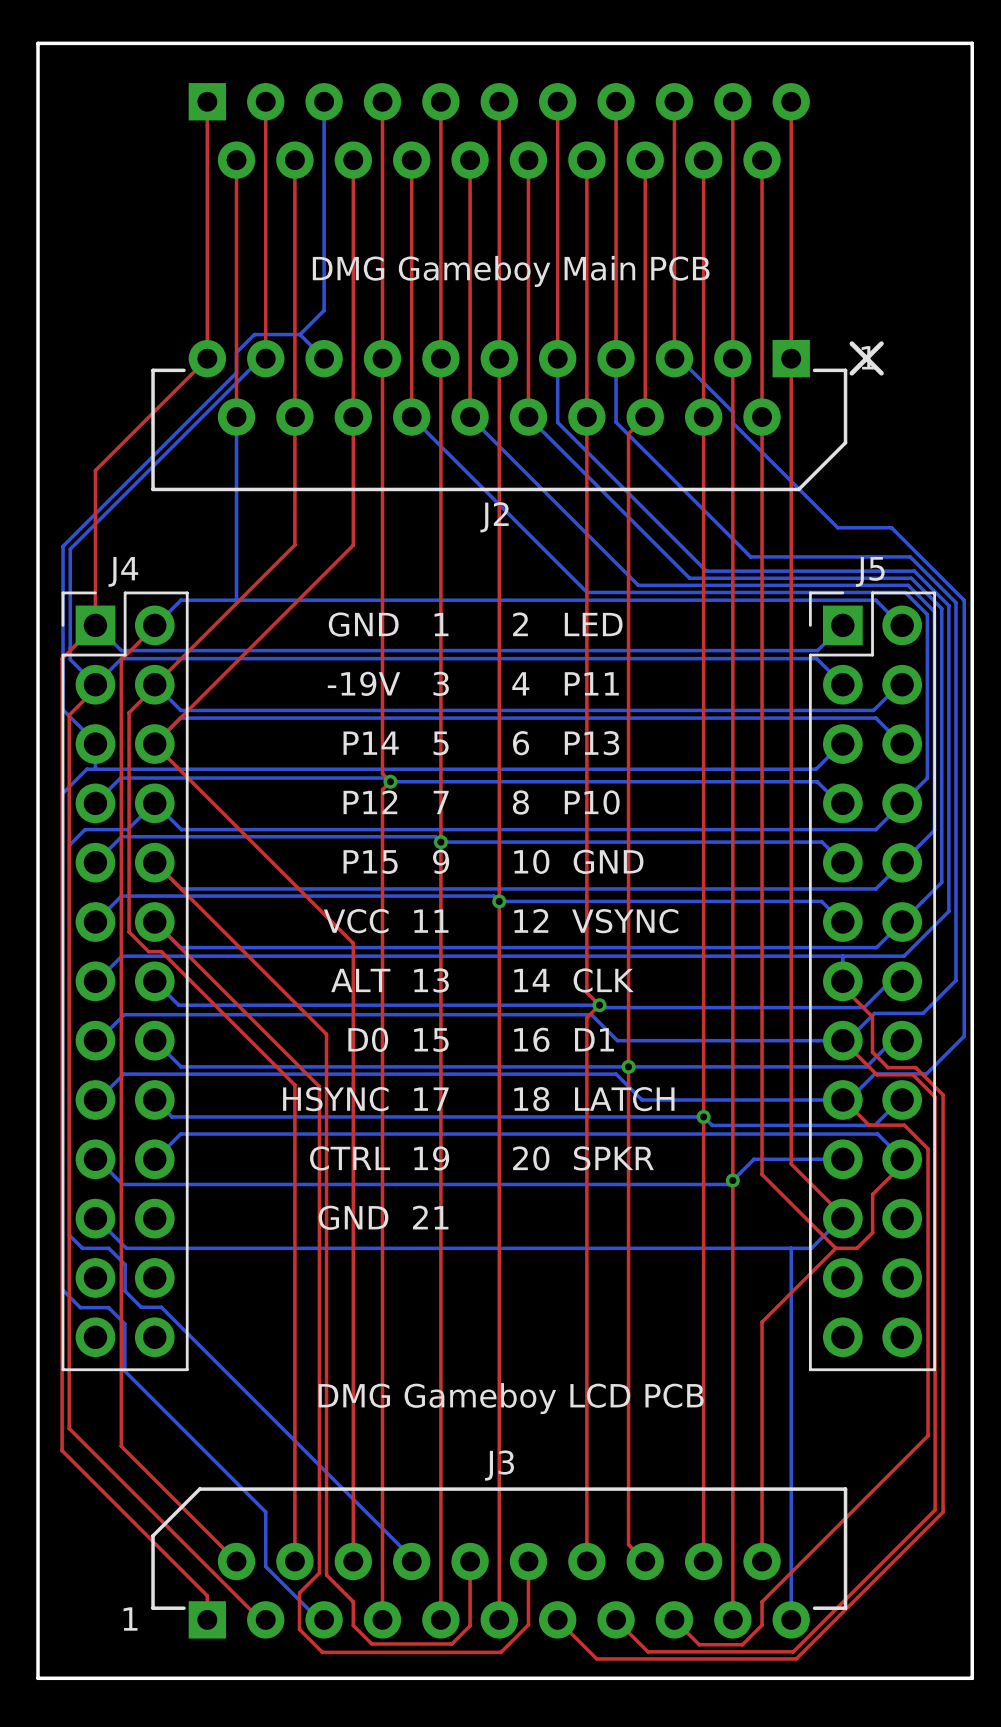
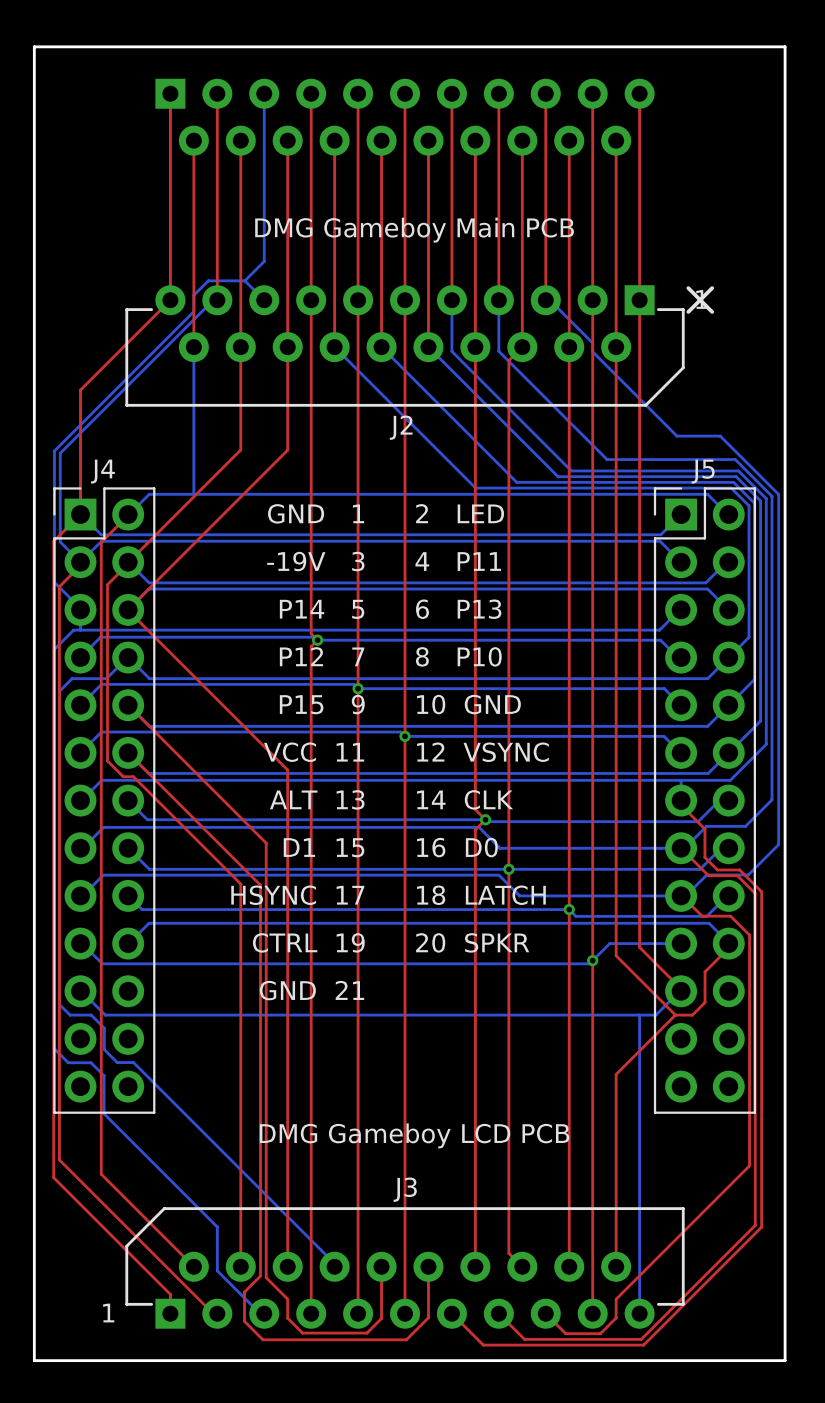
text: D0 15 (398, 1039) -> D1 15 (324, 847)
text: 16 D1 (564, 1039) -> 16 D0 (457, 847)

